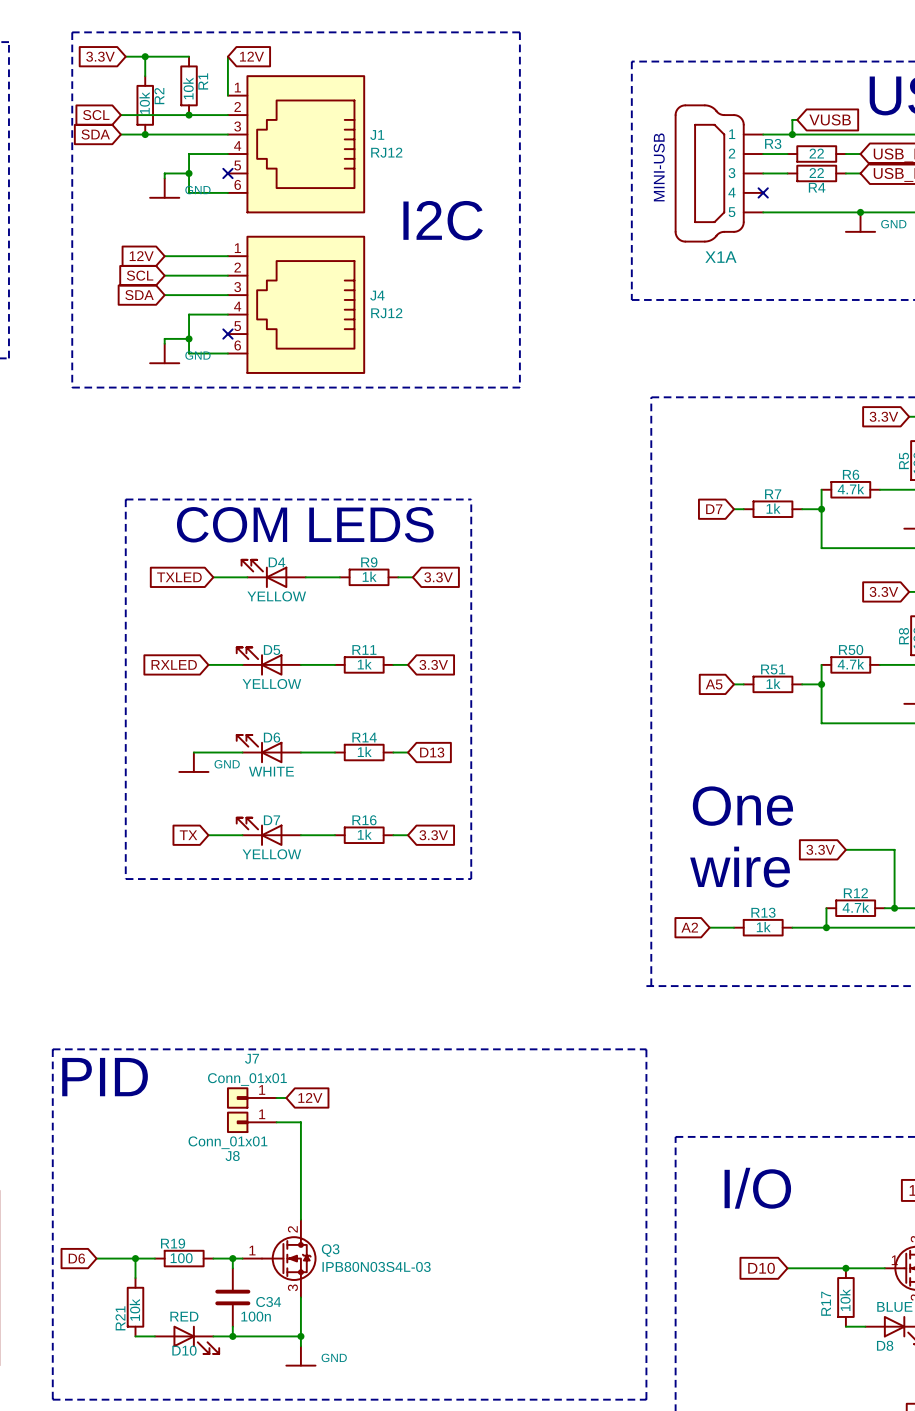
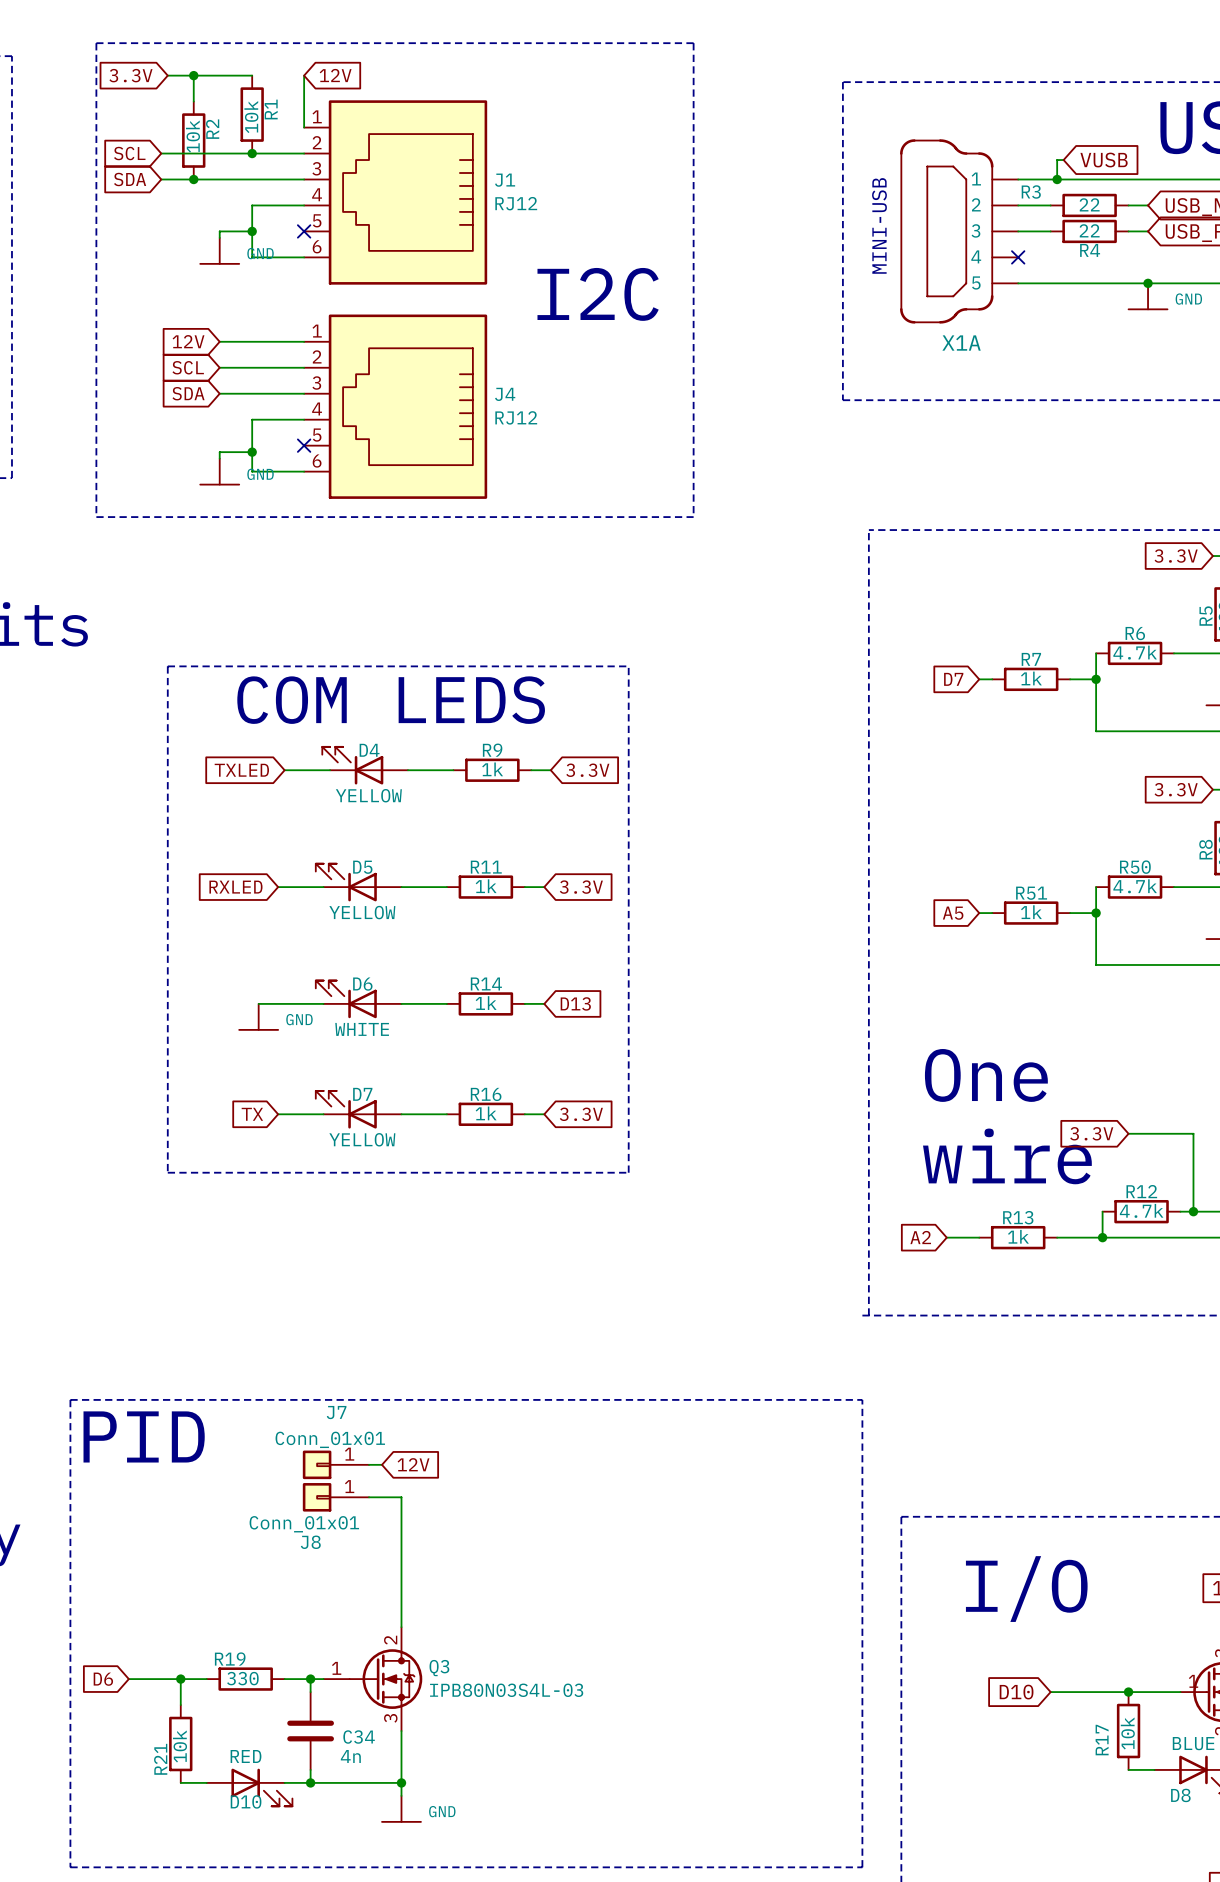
R19 value: 100 (181, 1258) -> 330 (242, 1678)
C34 value: 100n (256, 1316) -> 4n (350, 1756)

